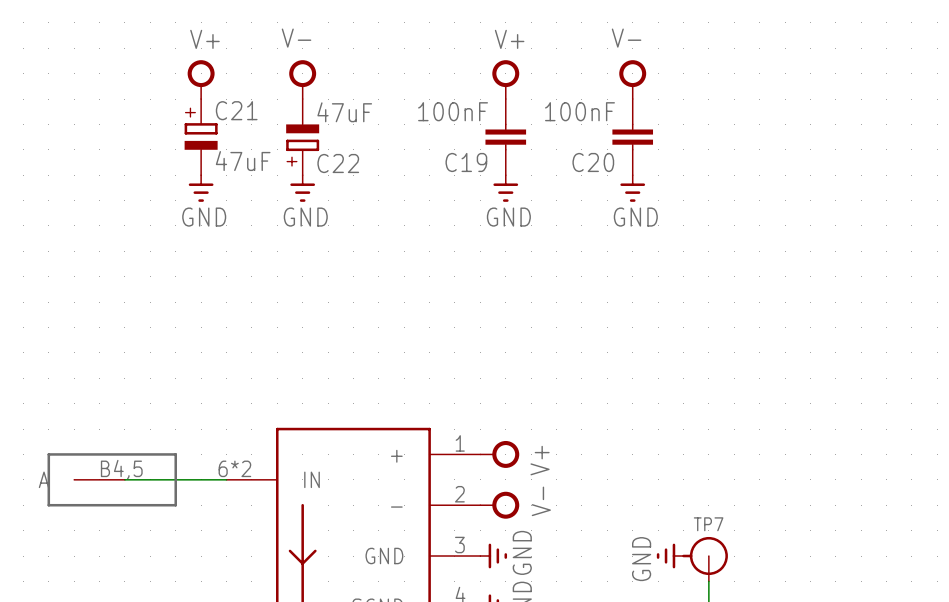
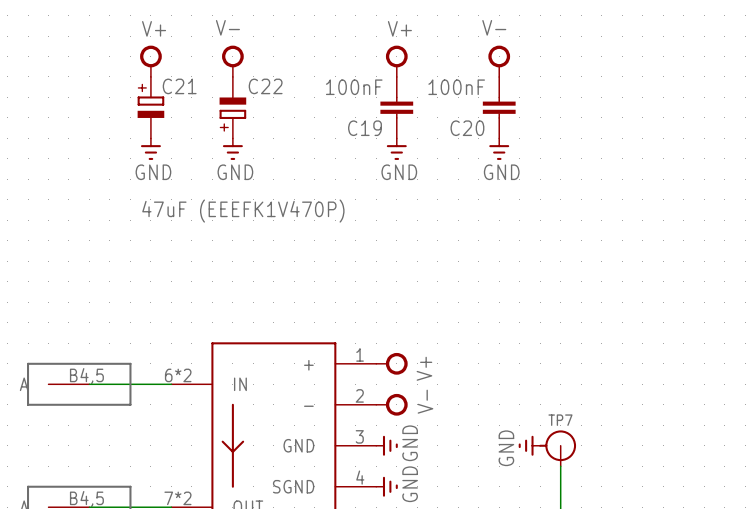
C22 value: 47uF (344, 112) -> none
C21 value: 47uF (243, 161) -> 47uF (EEEFK1V470P) (243, 211)
C22 name position: C22 (338, 163) -> C22 (265, 86)

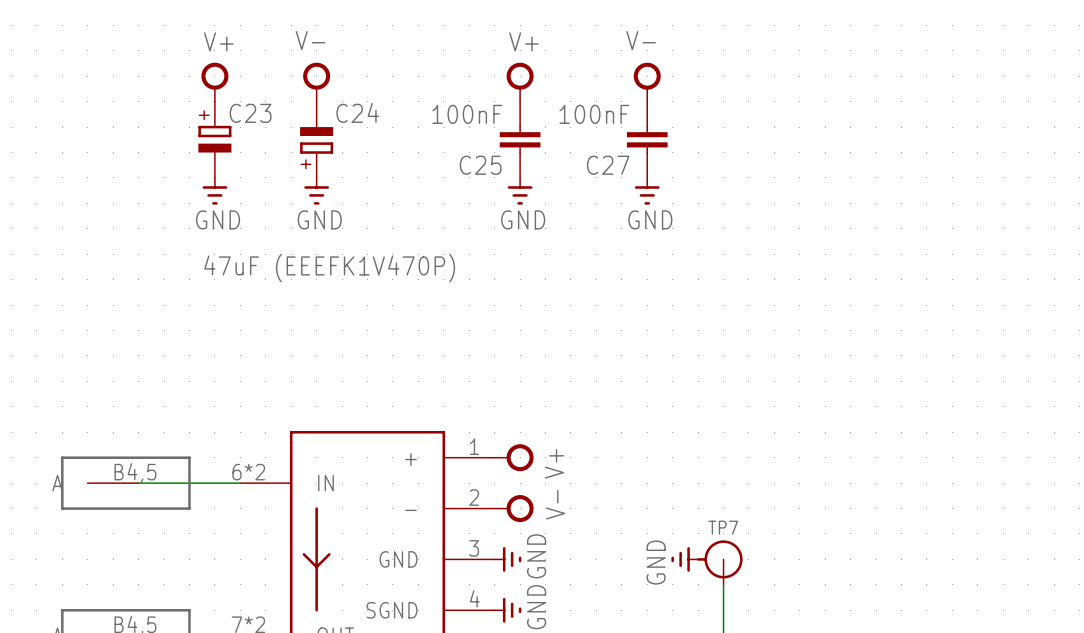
C21 name: C21 (179, 86) -> C23 (250, 113)
C22 name: C22 (265, 86) -> C24 (357, 112)
C19 name: C19 (365, 128) -> C25 (480, 165)
C20 name: C20 (467, 128) -> C27 (608, 165)

